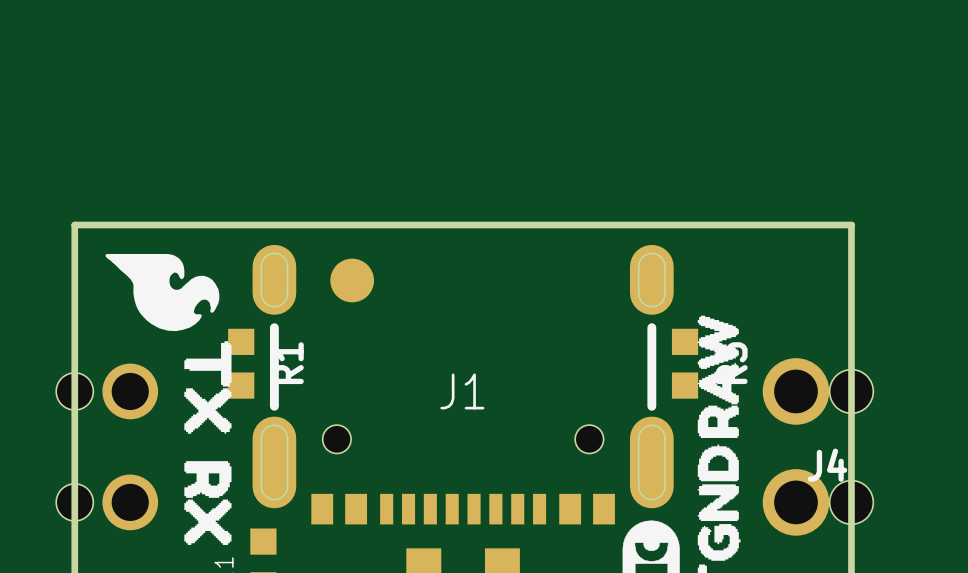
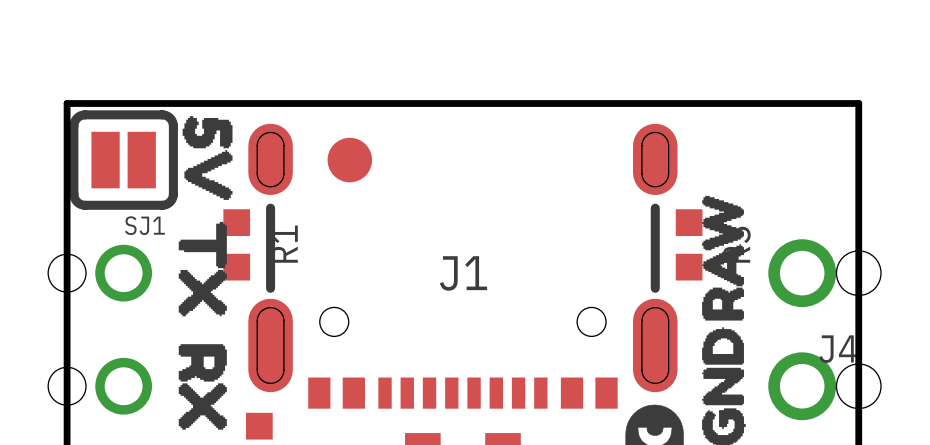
drawing: none -> [182, 116, 233, 200]
drawing: [105, 253, 220, 332] -> none
SJ1: none -> (123, 160)

